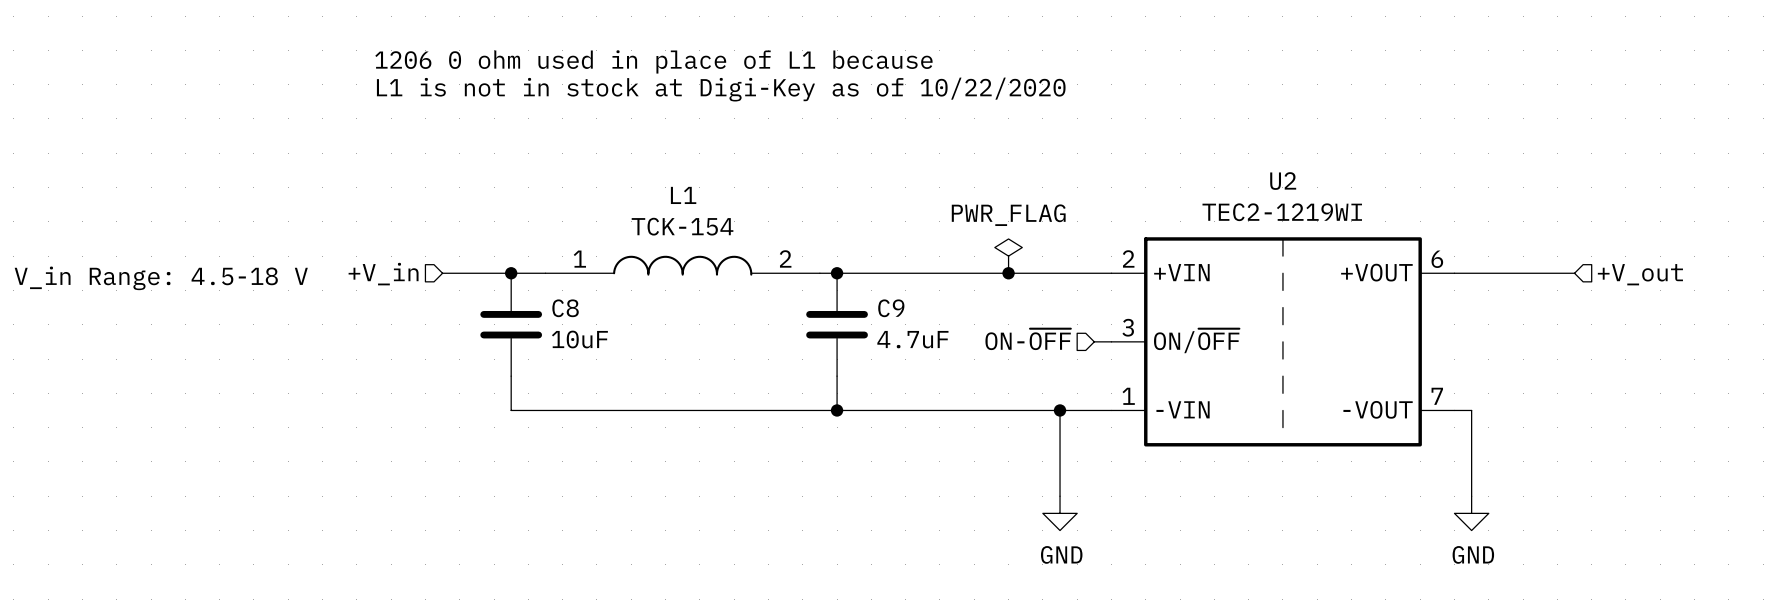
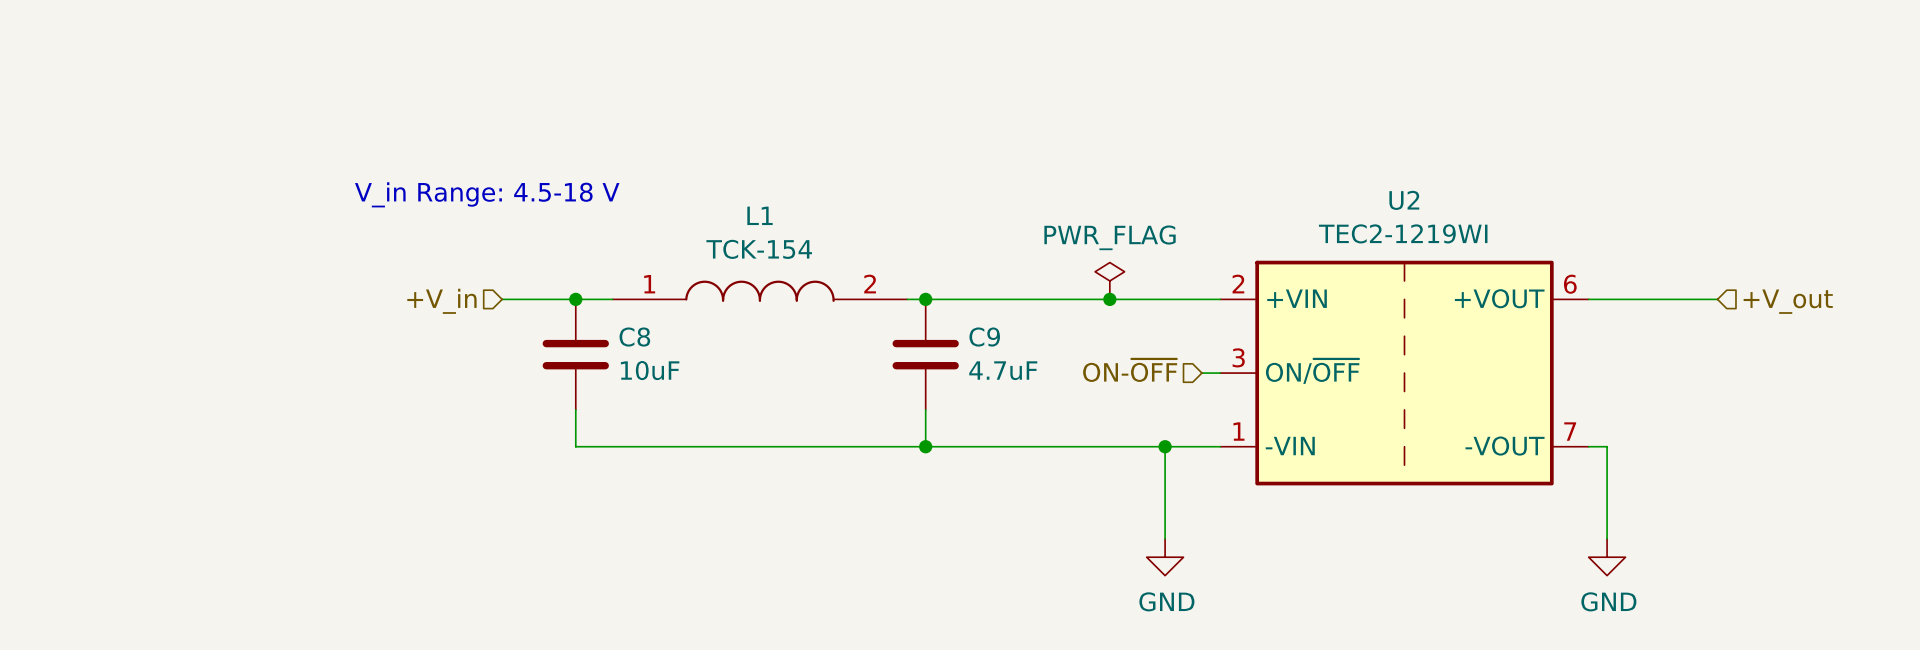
text: 1206 0 ohm used in place of L1 because (653, 61) -> none
text: L1 is not in stock at Digi-Key as of 10/22/2020 (721, 89) -> none
text position: V_in Range: 4.5-18 V (161, 278) -> V_in Range: 4.5-18 V (487, 194)

